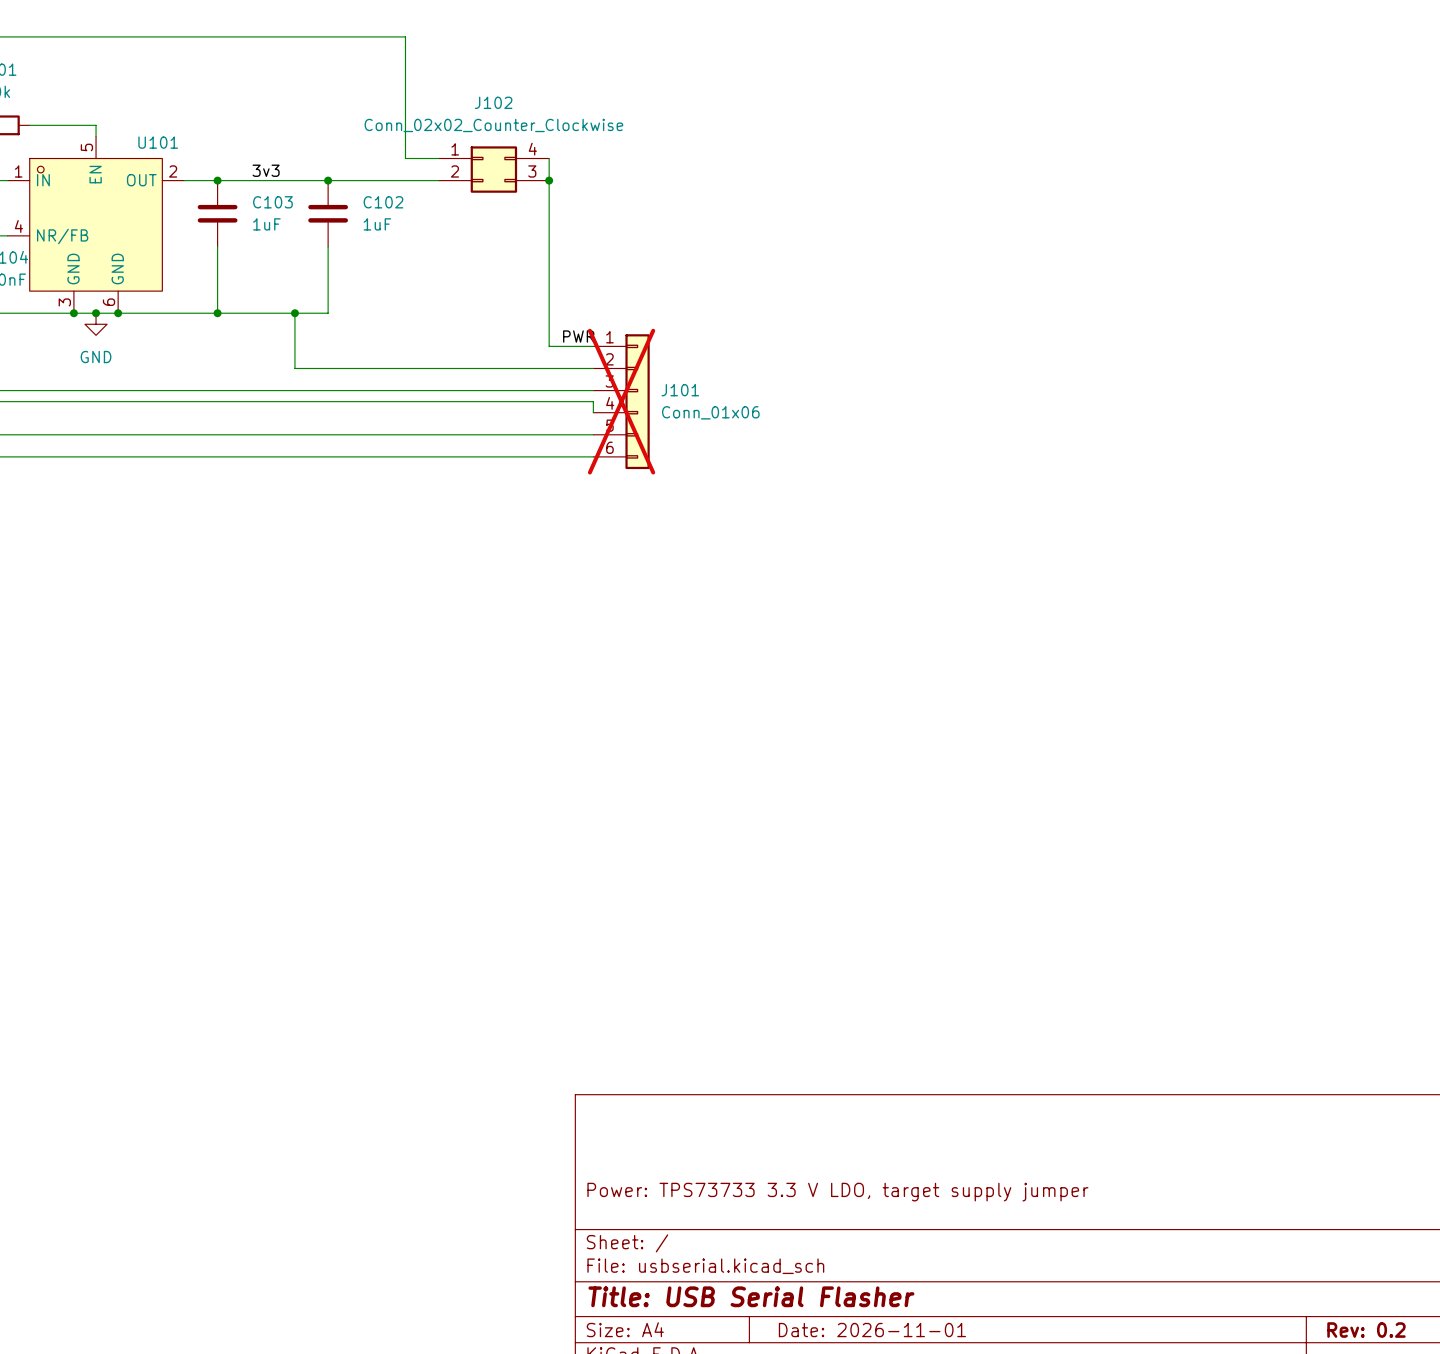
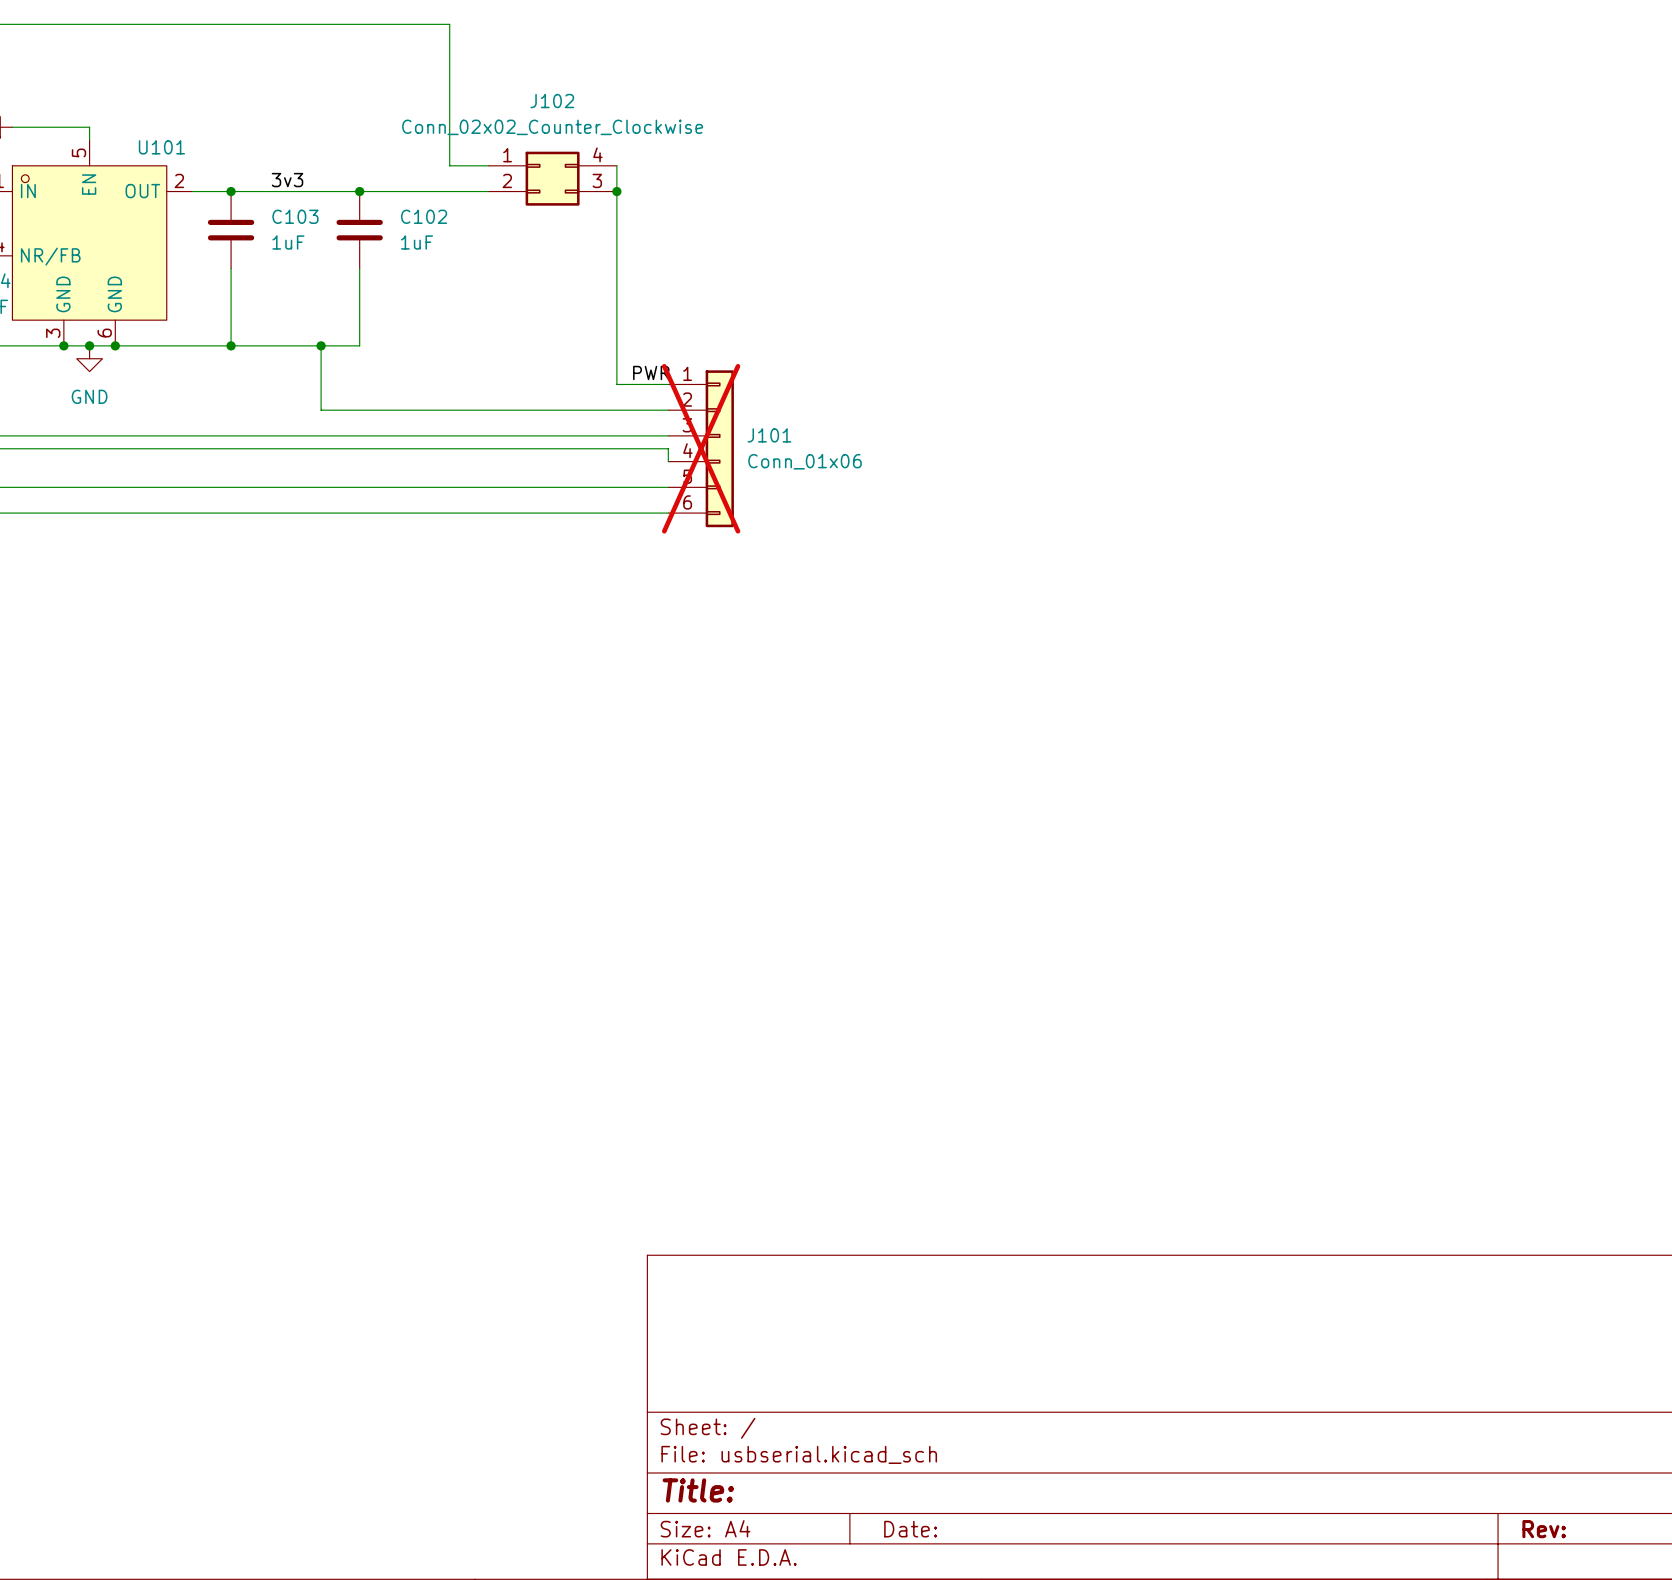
title block: Power: TPS73733 3.3 V LDO, target supply jumper (837, 1192) -> none
title block: Title: USB Serial Flasher (751, 1296) -> Title: (698, 1490)
title block: Date: 2026-11-01 (872, 1330) -> Date: (910, 1529)
title block: Rev: 0.2 (1366, 1330) -> Rev: (1544, 1529)

